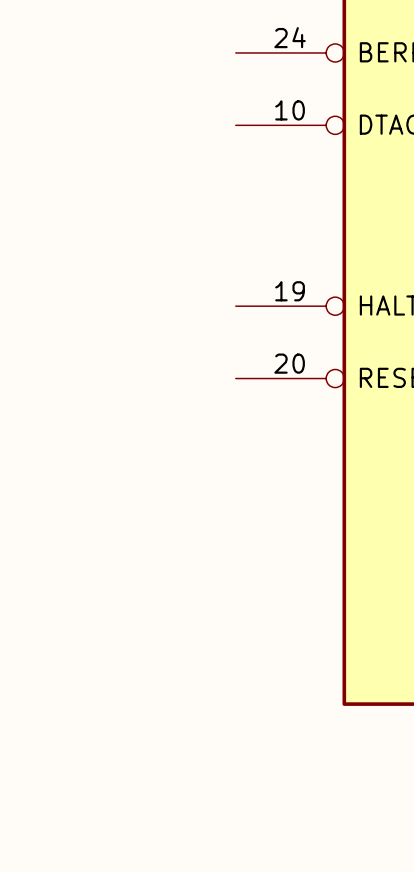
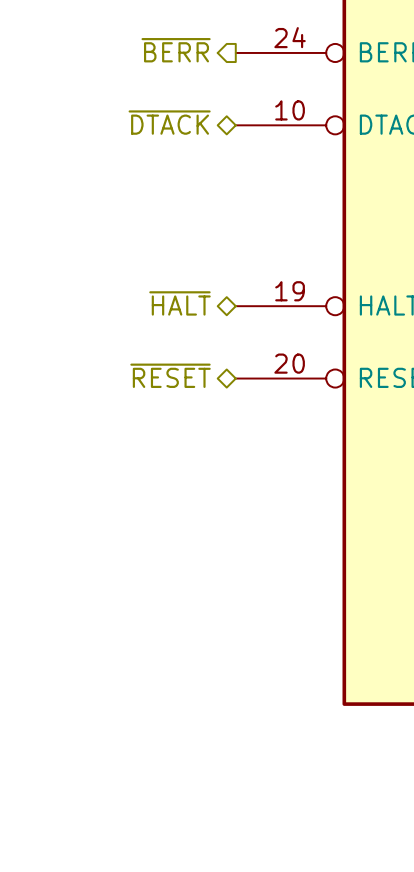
hierarchical label: none -> ~{BERR} (176, 50)
hierarchical label: none -> ~{DTACK} (169, 122)
hierarchical label: none -> ~{HALT} (180, 303)
hierarchical label: none -> ~{RESET} (170, 375)

